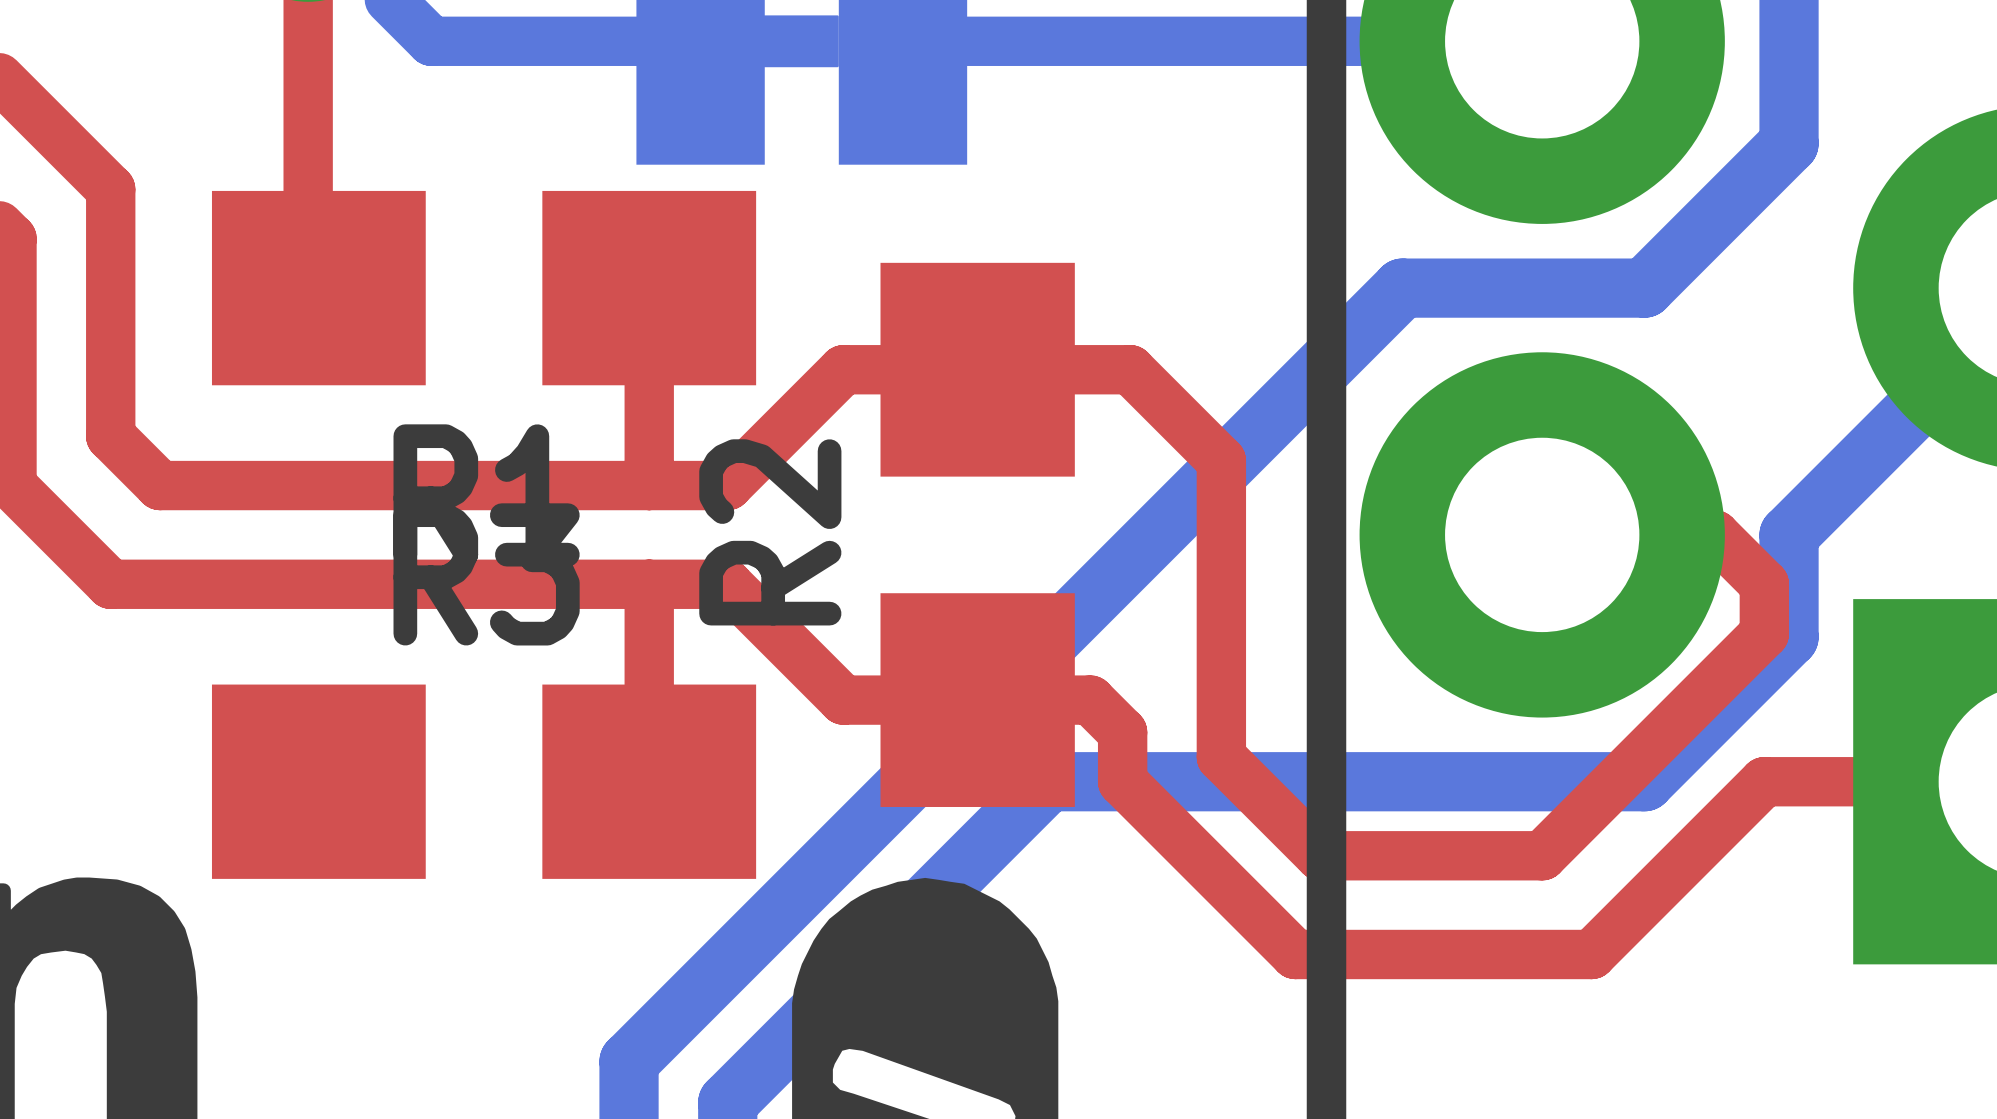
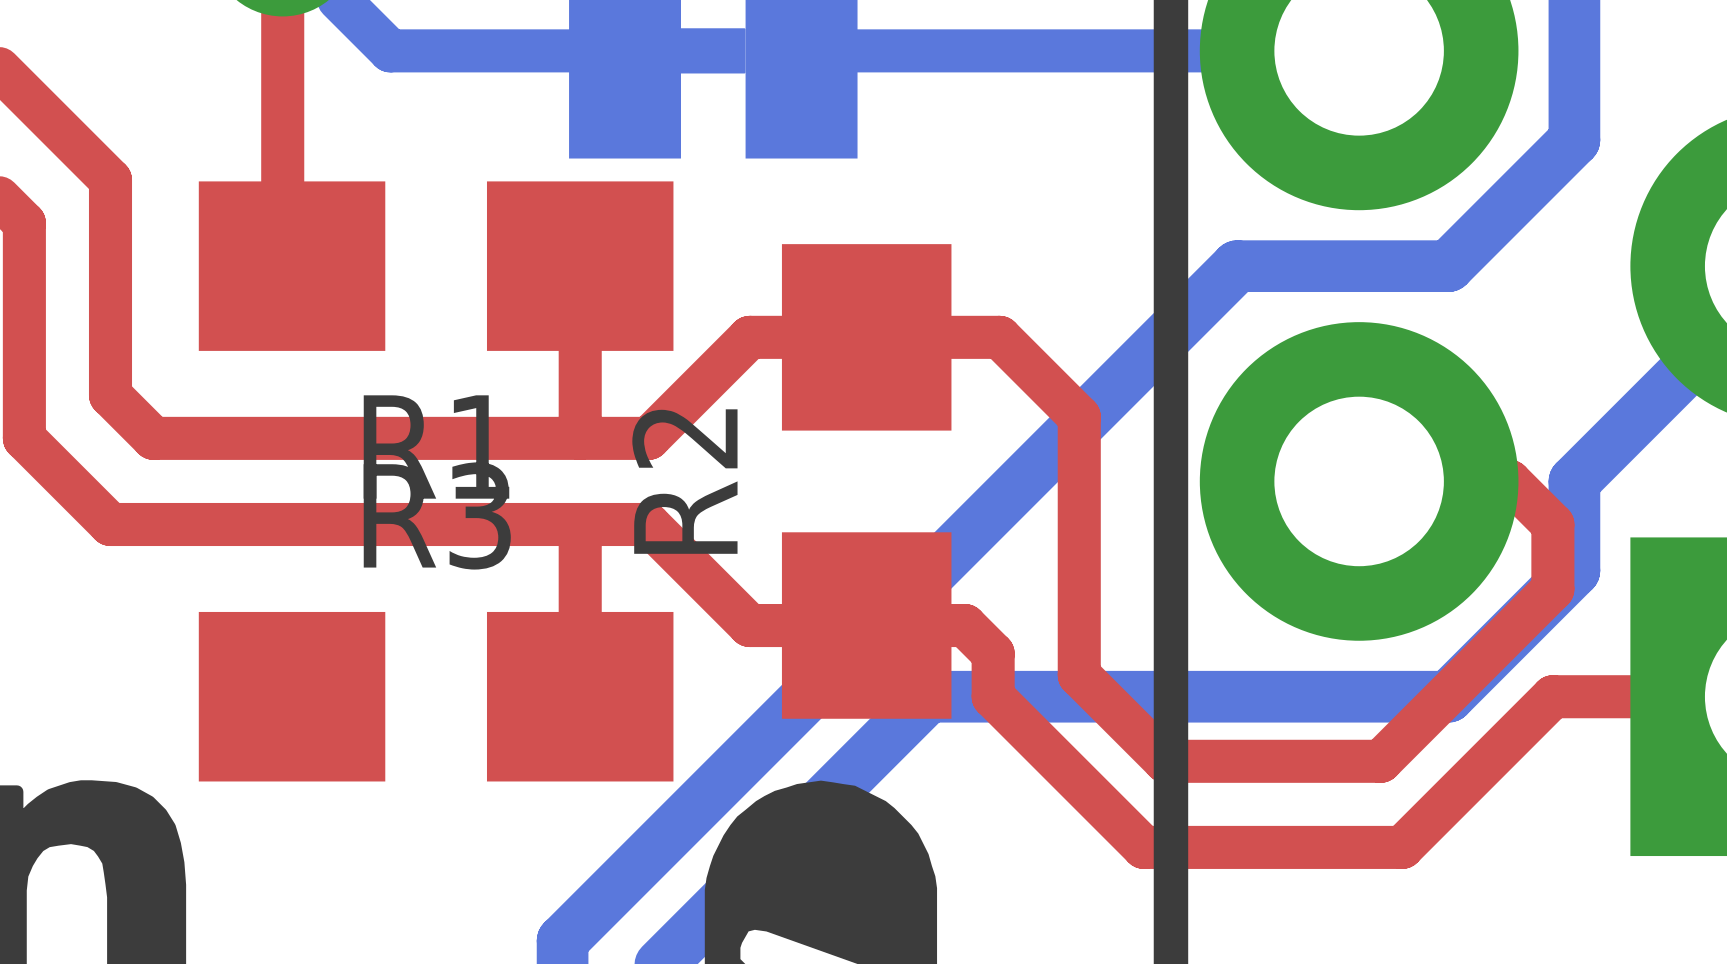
top track: (1764, 633) (1542, 855) -> (1552, 567) (1552, 589) (1380, 761) (1359, 761)

